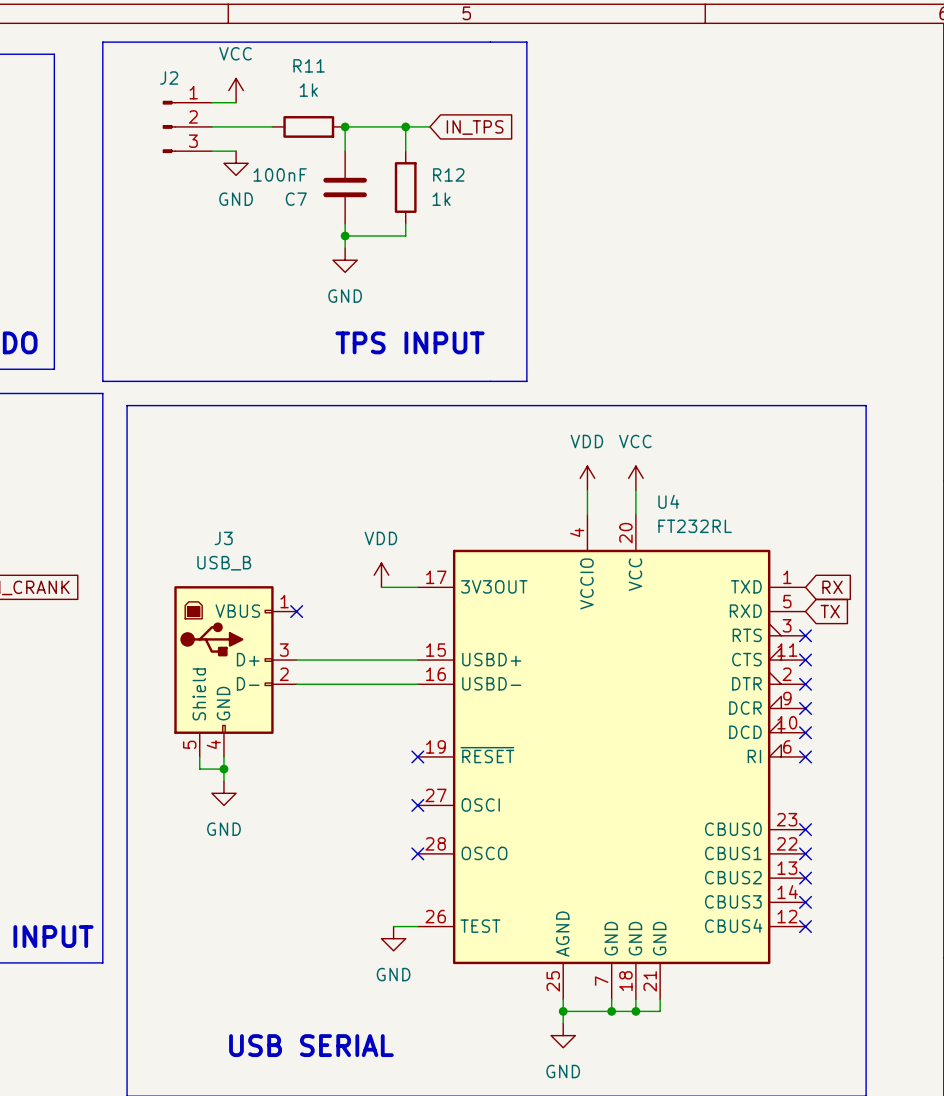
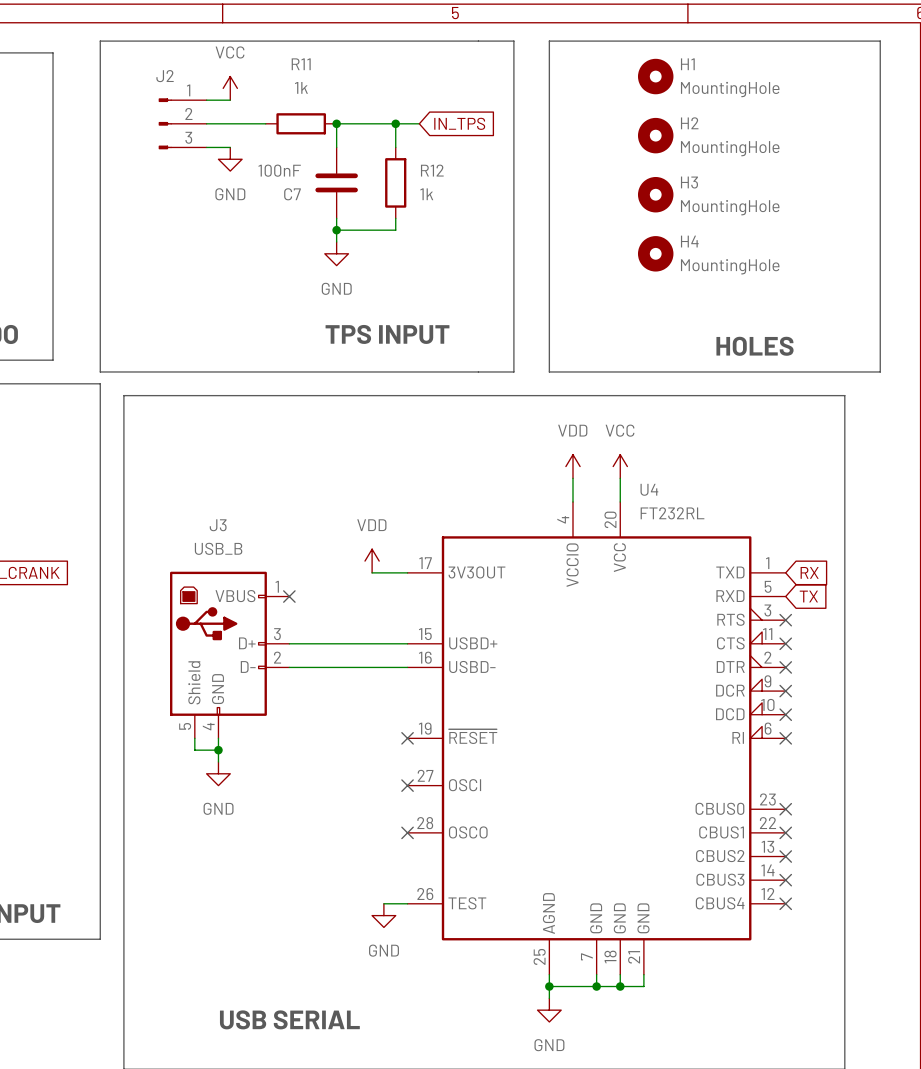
line: none -> (549, 41) (549, 371) (880, 371) (880, 41) (549, 41)
H1: none -> MountingHole (655, 76)
H2: none -> MountingHole (655, 135)
H3: none -> MountingHole (655, 194)
H4: none -> MountingHole (655, 253)
text: none -> HOLES (754, 346)

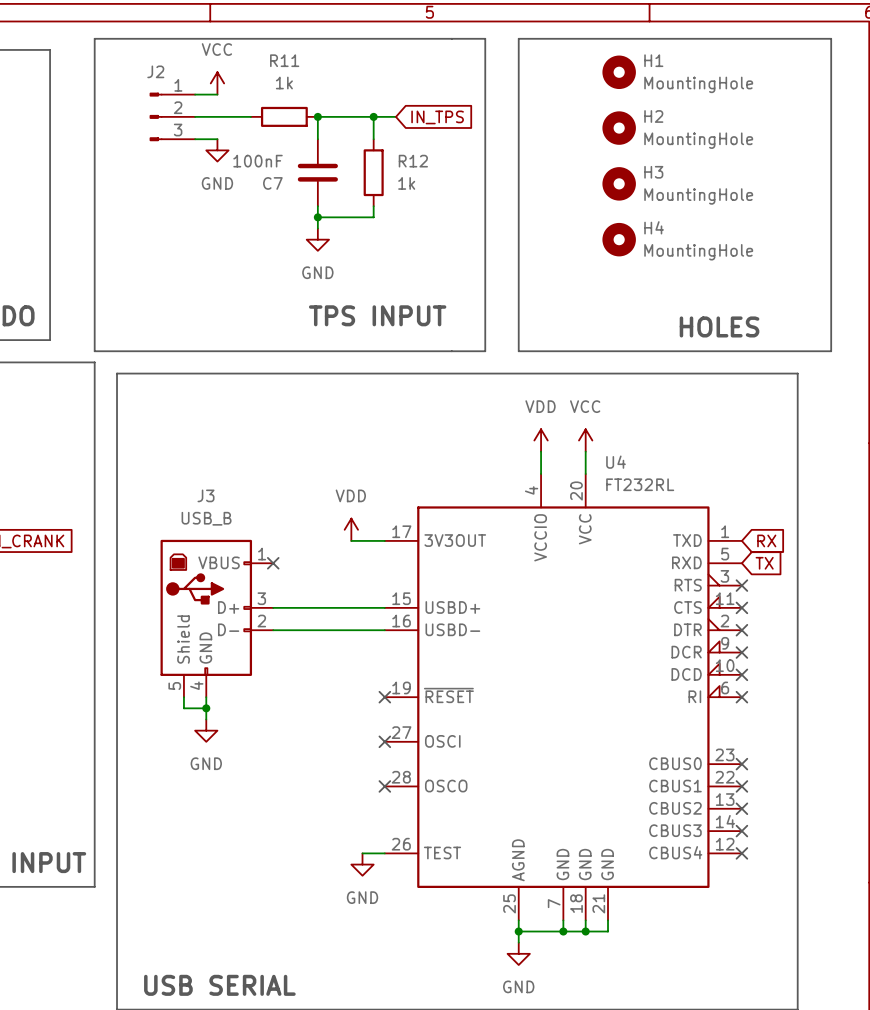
text position: USB SERIAL (289, 1019) -> USB SERIAL (219, 985)

